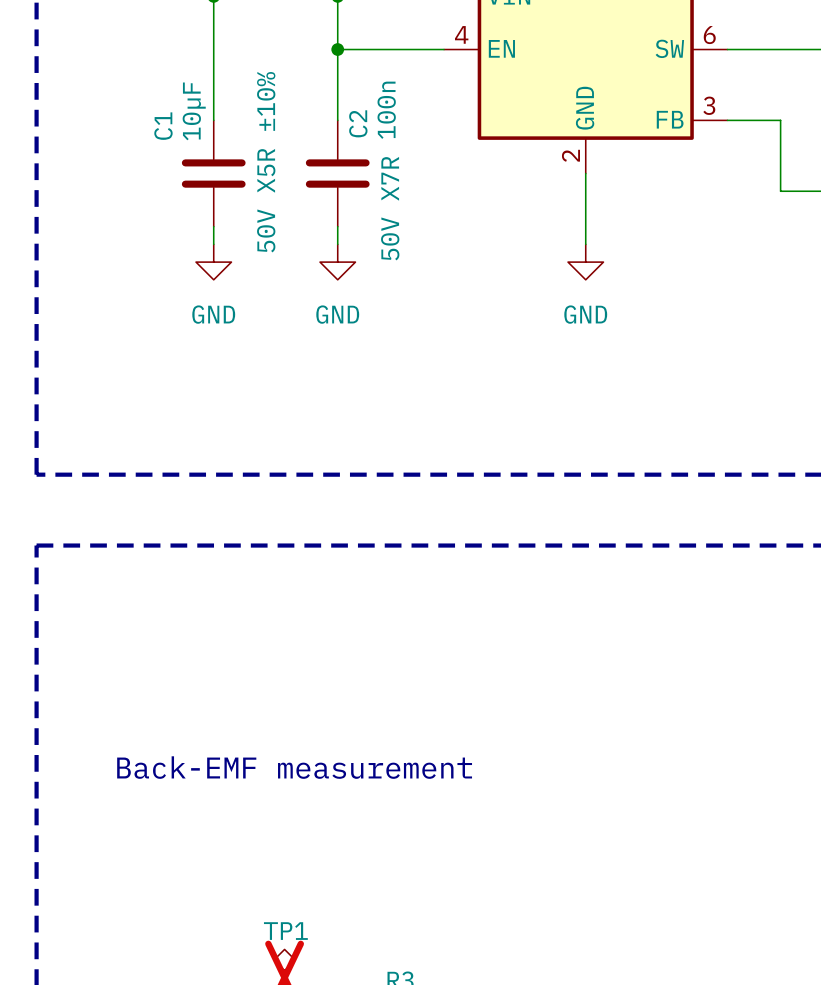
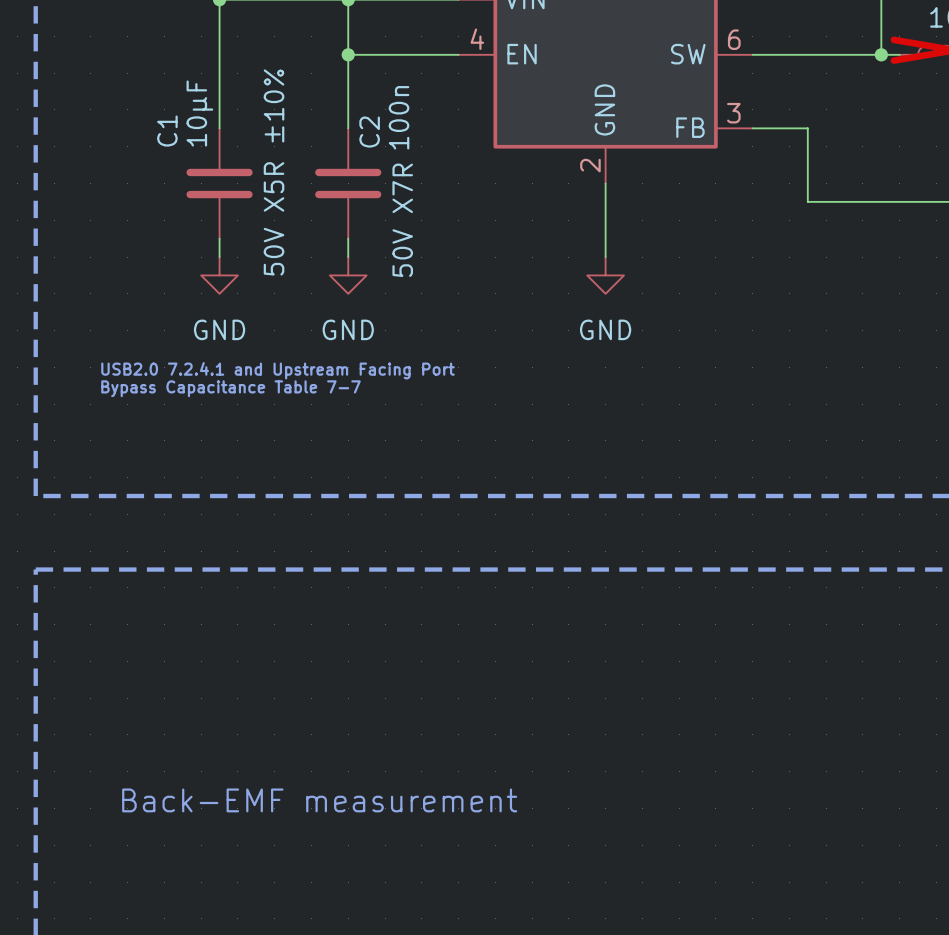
text: none -> USB2.0 7.2.4.1 and Upstream Facing Port (278, 370)
text: none -> Bypass Capacitance Table 7-7 (231, 388)

